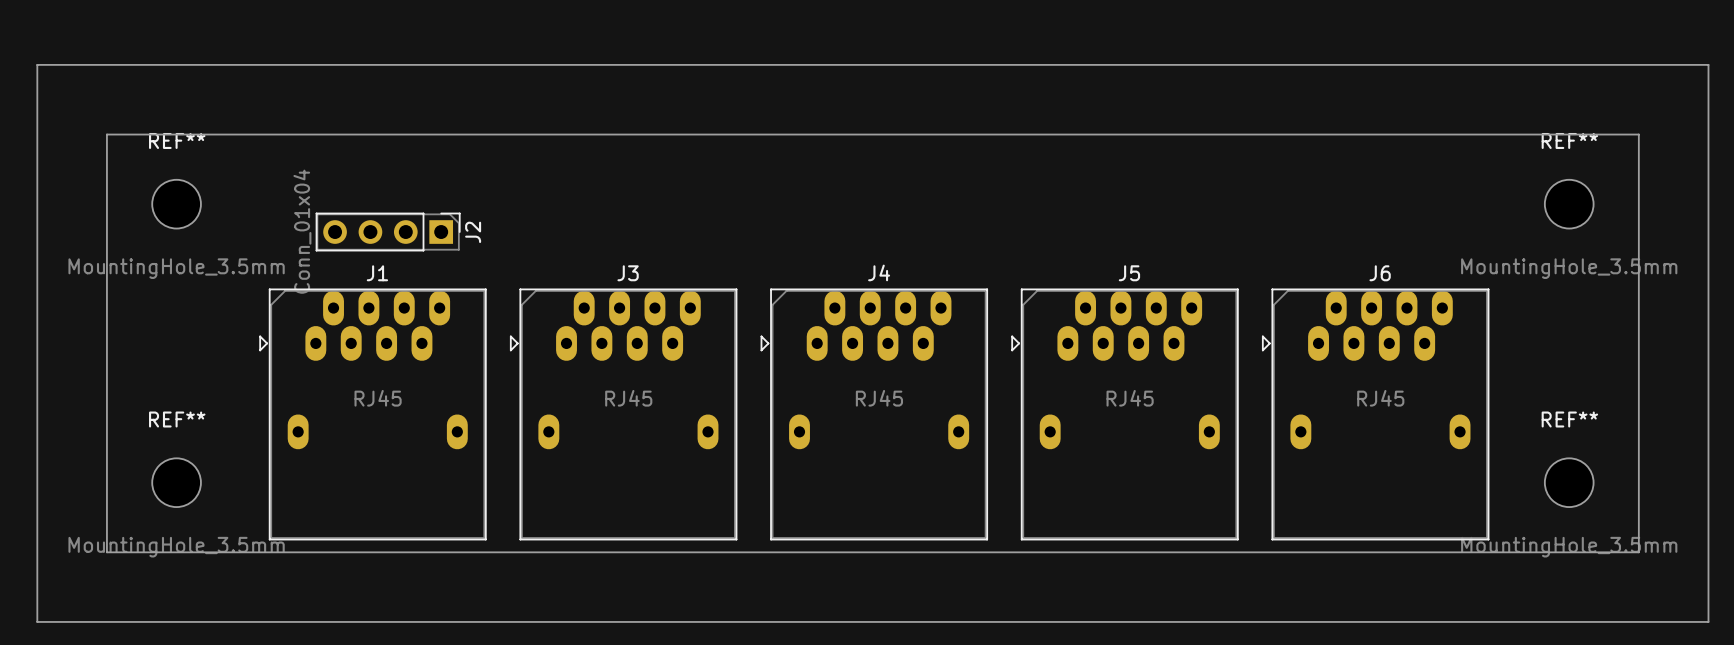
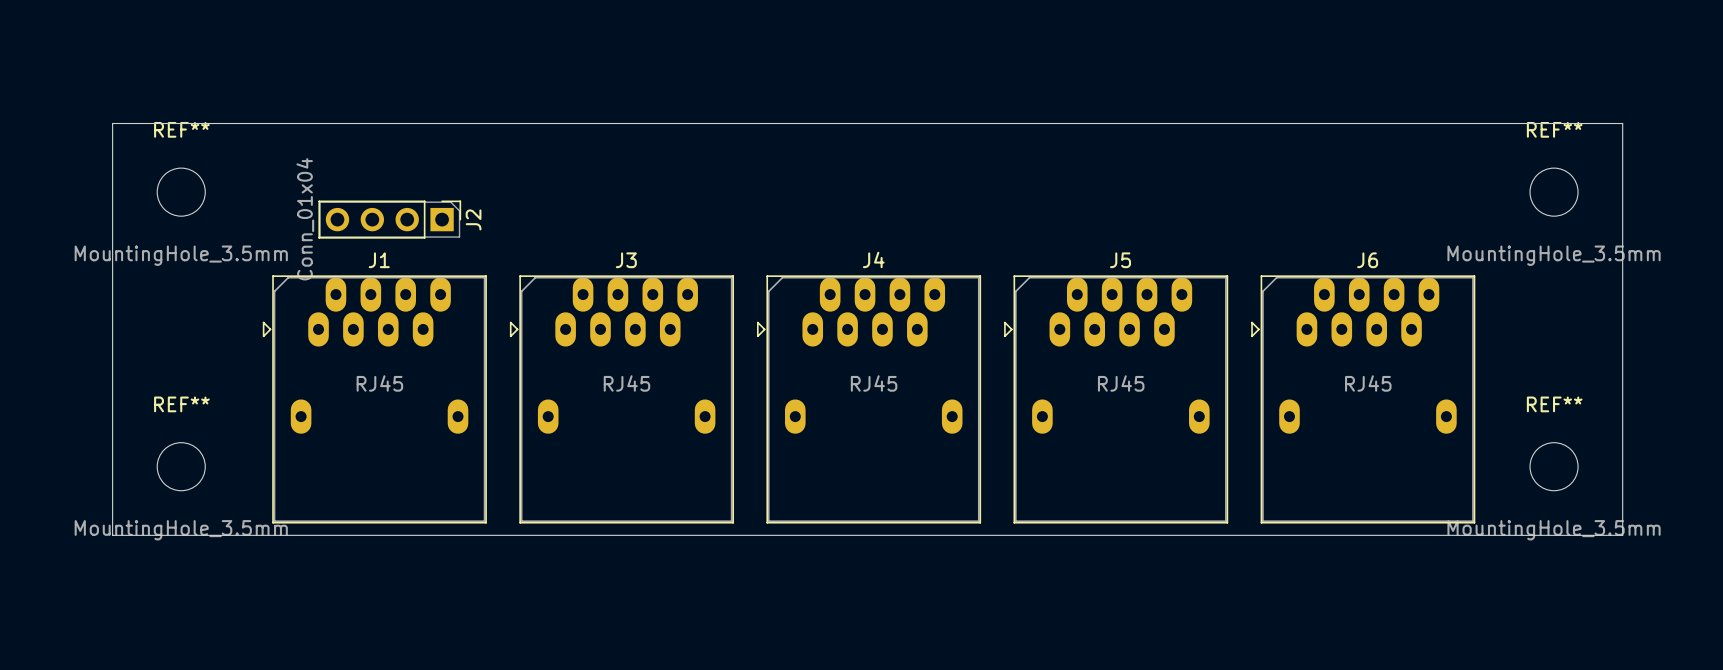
board edge: (37, 64) (1708, 64) (1708, 621) (37, 621) (37, 64) -> none

